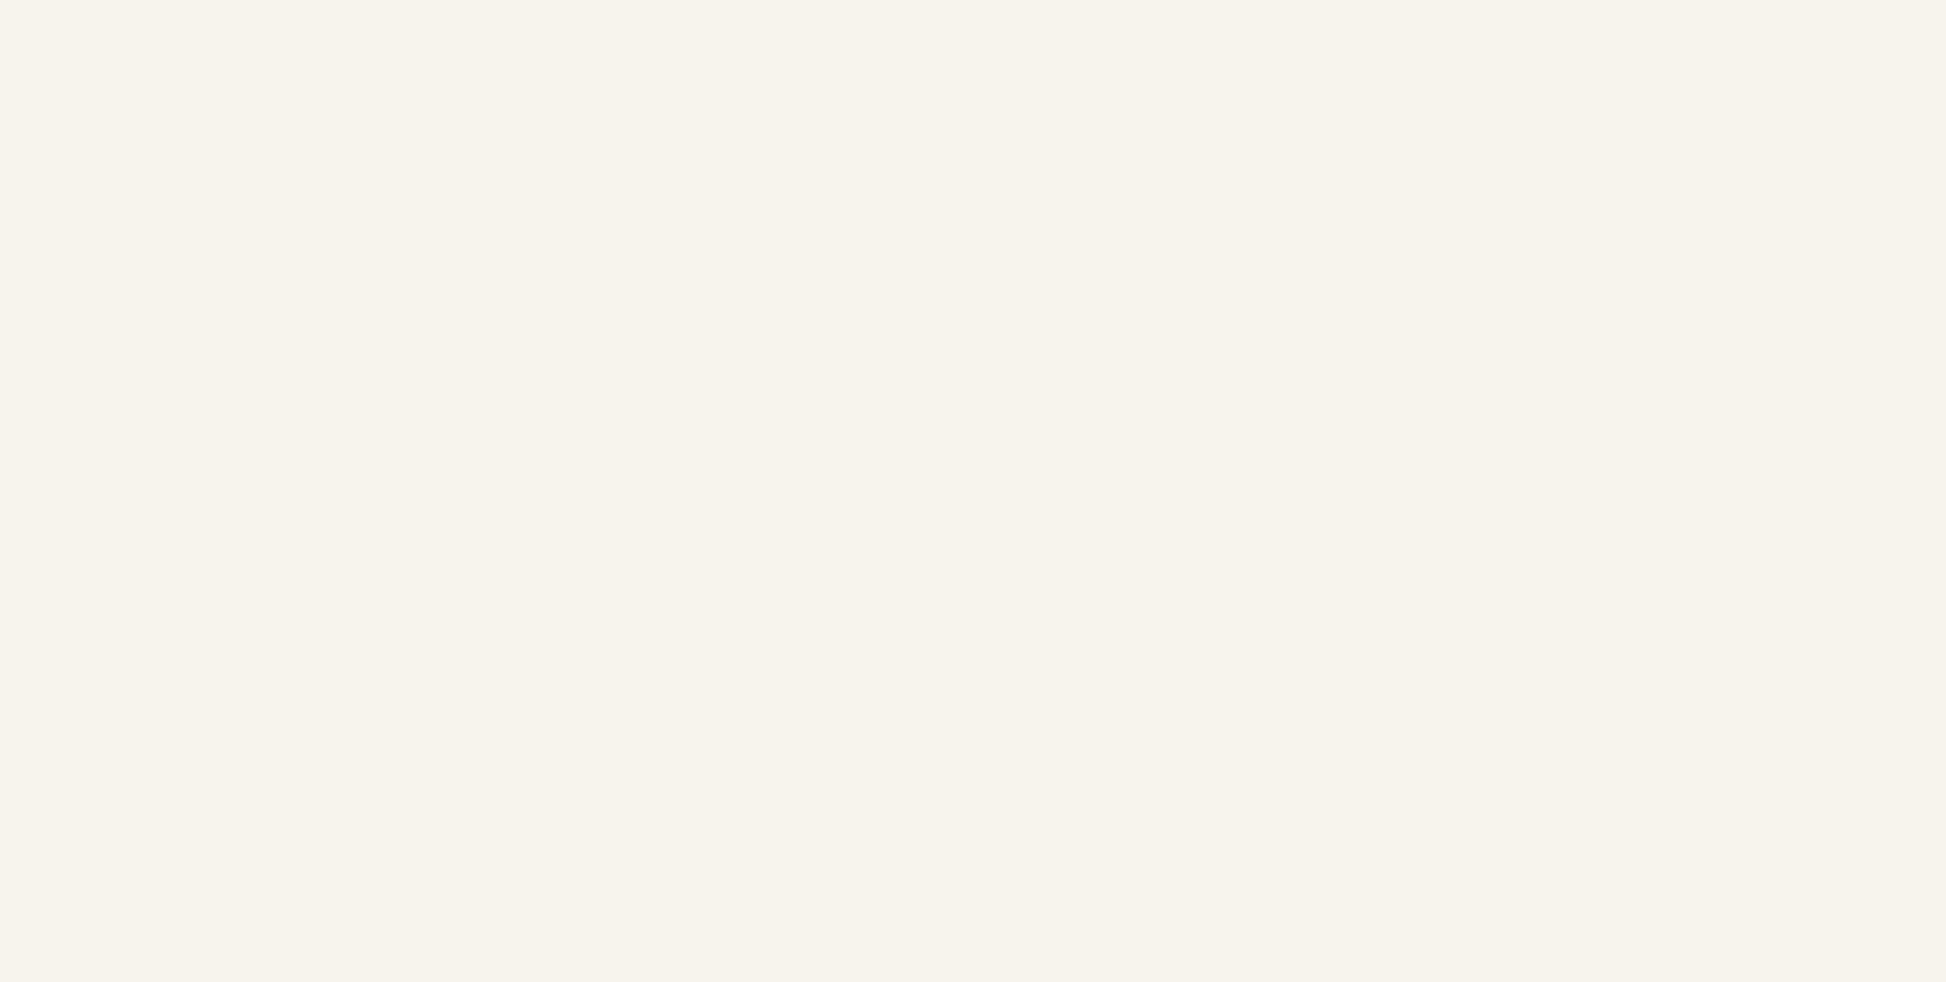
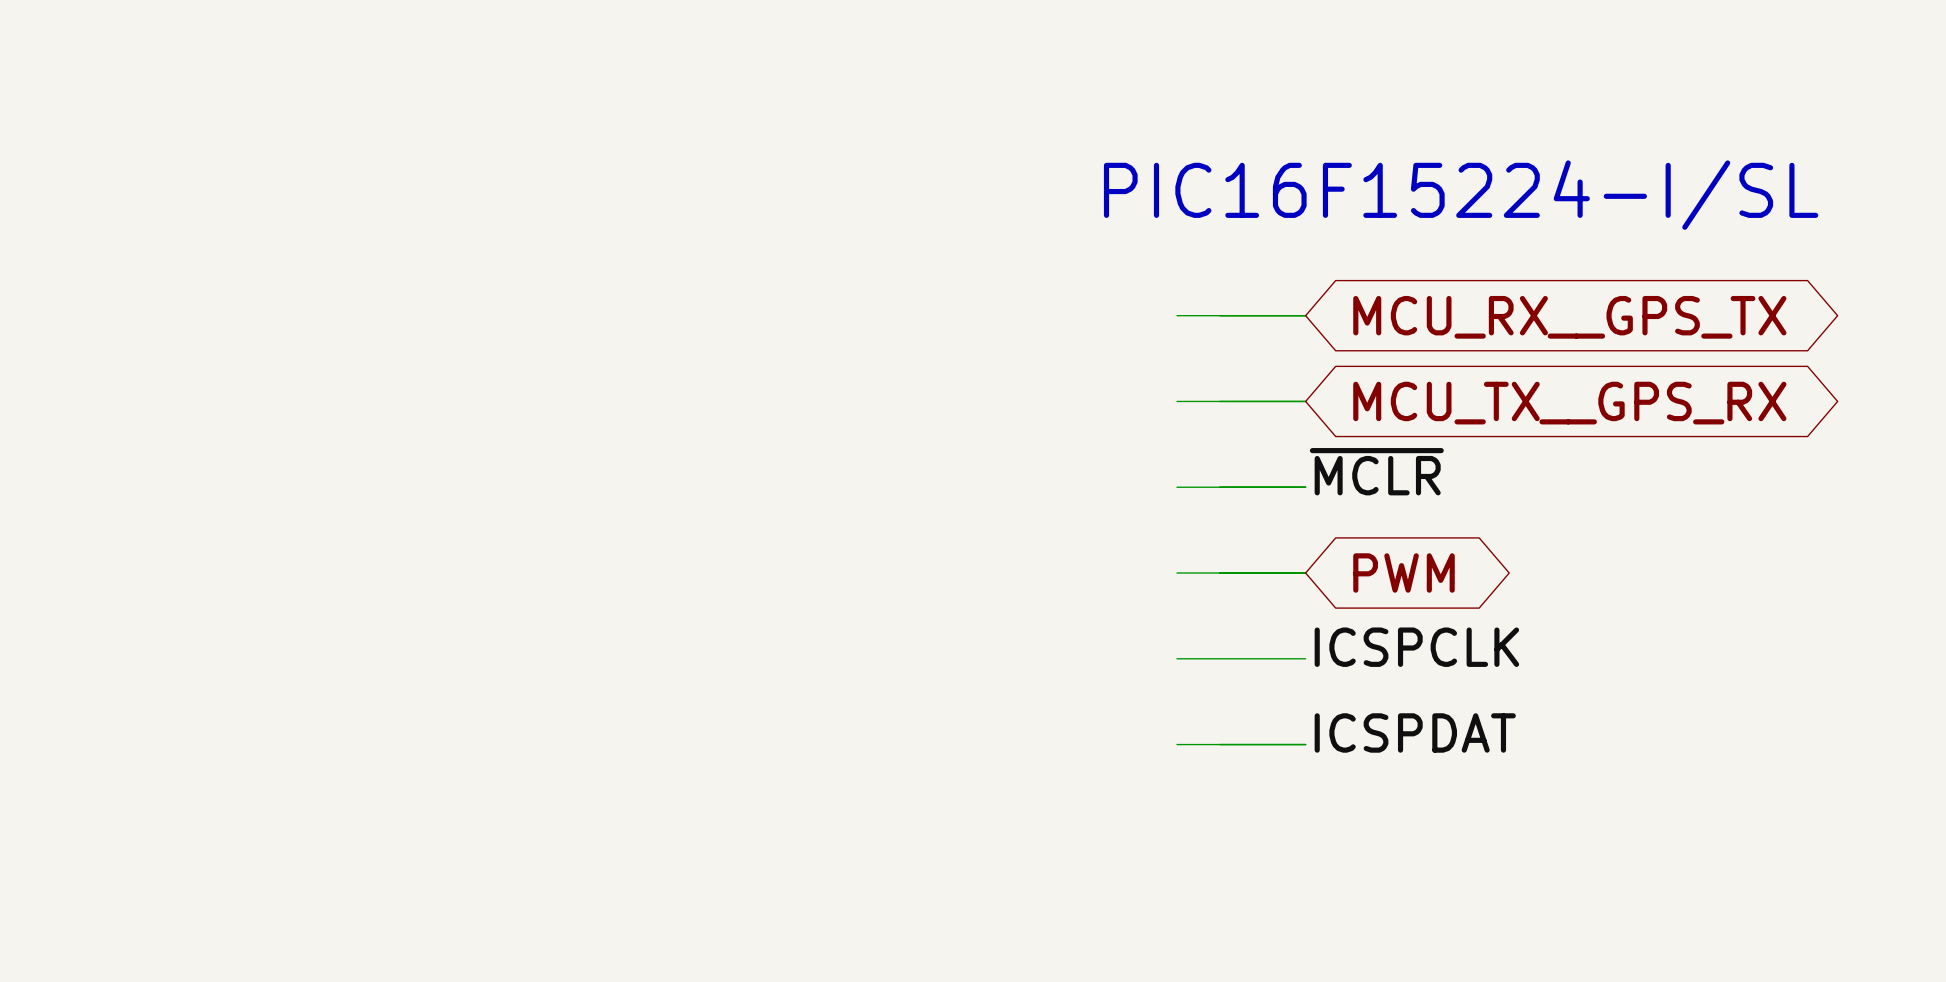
text: none -> PIC16F15224-I/SL (1461, 195)
wire: none -> (1176, 315) (1305, 315)
global label: none -> MCU_RX__GPS_TX (1569, 317)
wire: none -> (1176, 401) (1305, 401)
global label: none -> MCU_TX__GPS_RX (1569, 403)
label: none -> ~{MCLR} (1376, 471)
wire: none -> (1176, 487) (1305, 487)
wire: none -> (1176, 573) (1305, 573)
global label: none -> PWM (1404, 573)
label: none -> ICSPCLK (1416, 647)
wire: none -> (1176, 658) (1305, 658)
label: none -> ICSPDAT (1415, 732)
wire: none -> (1176, 744) (1305, 744)

